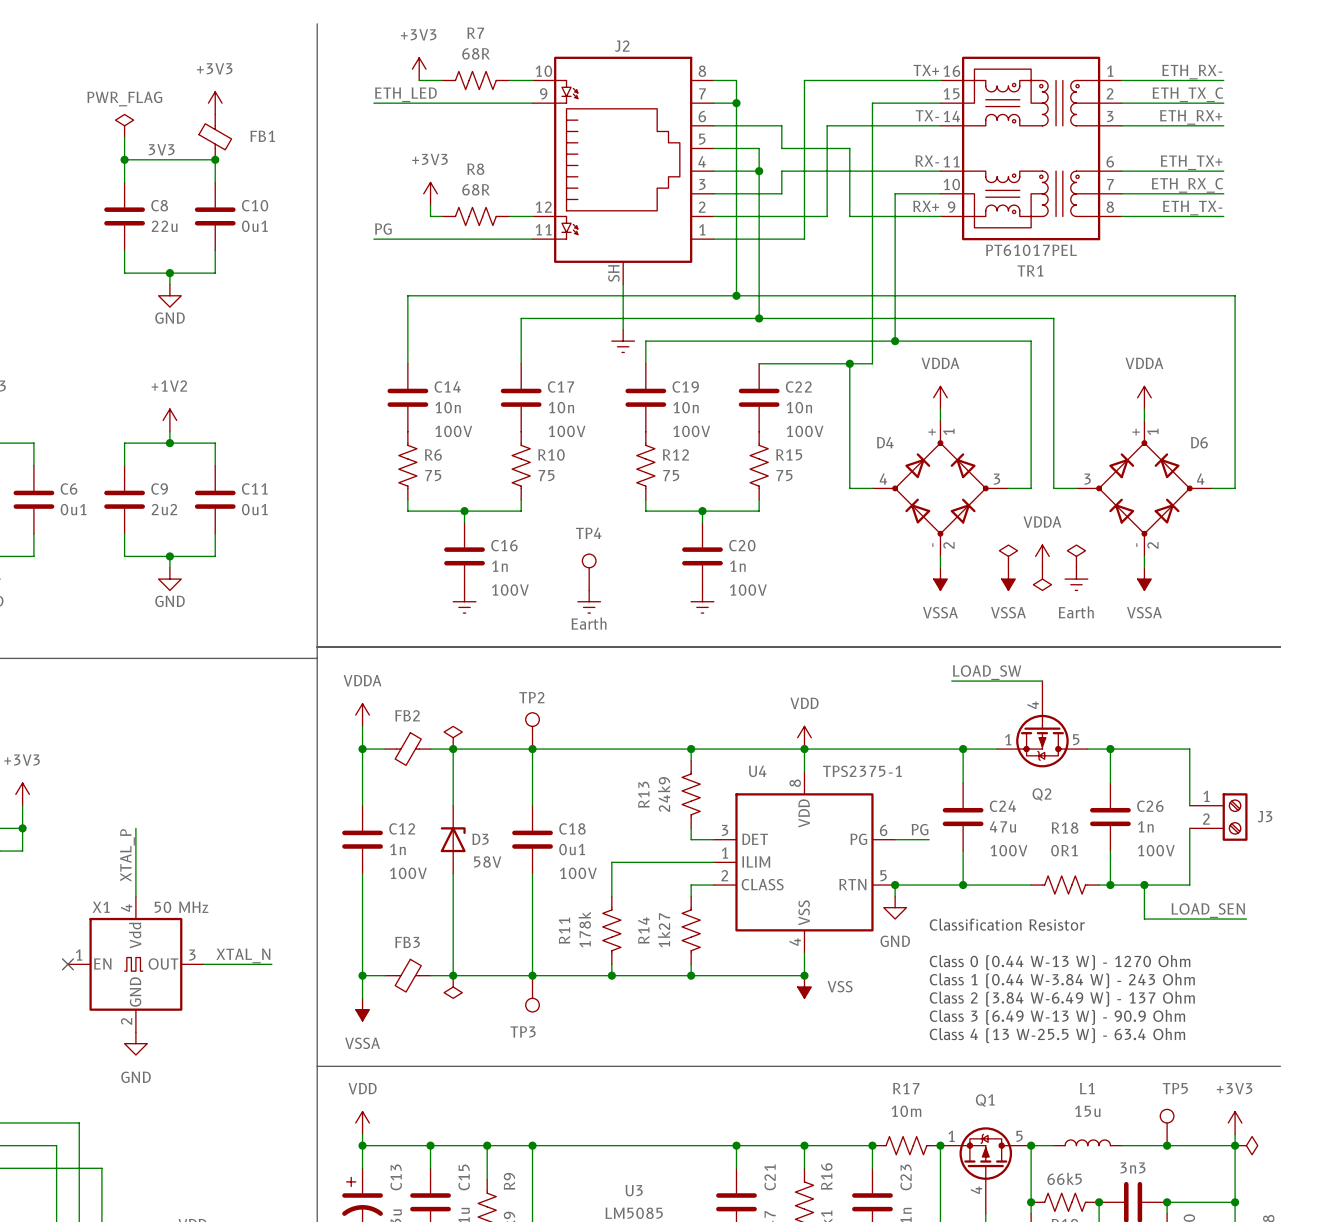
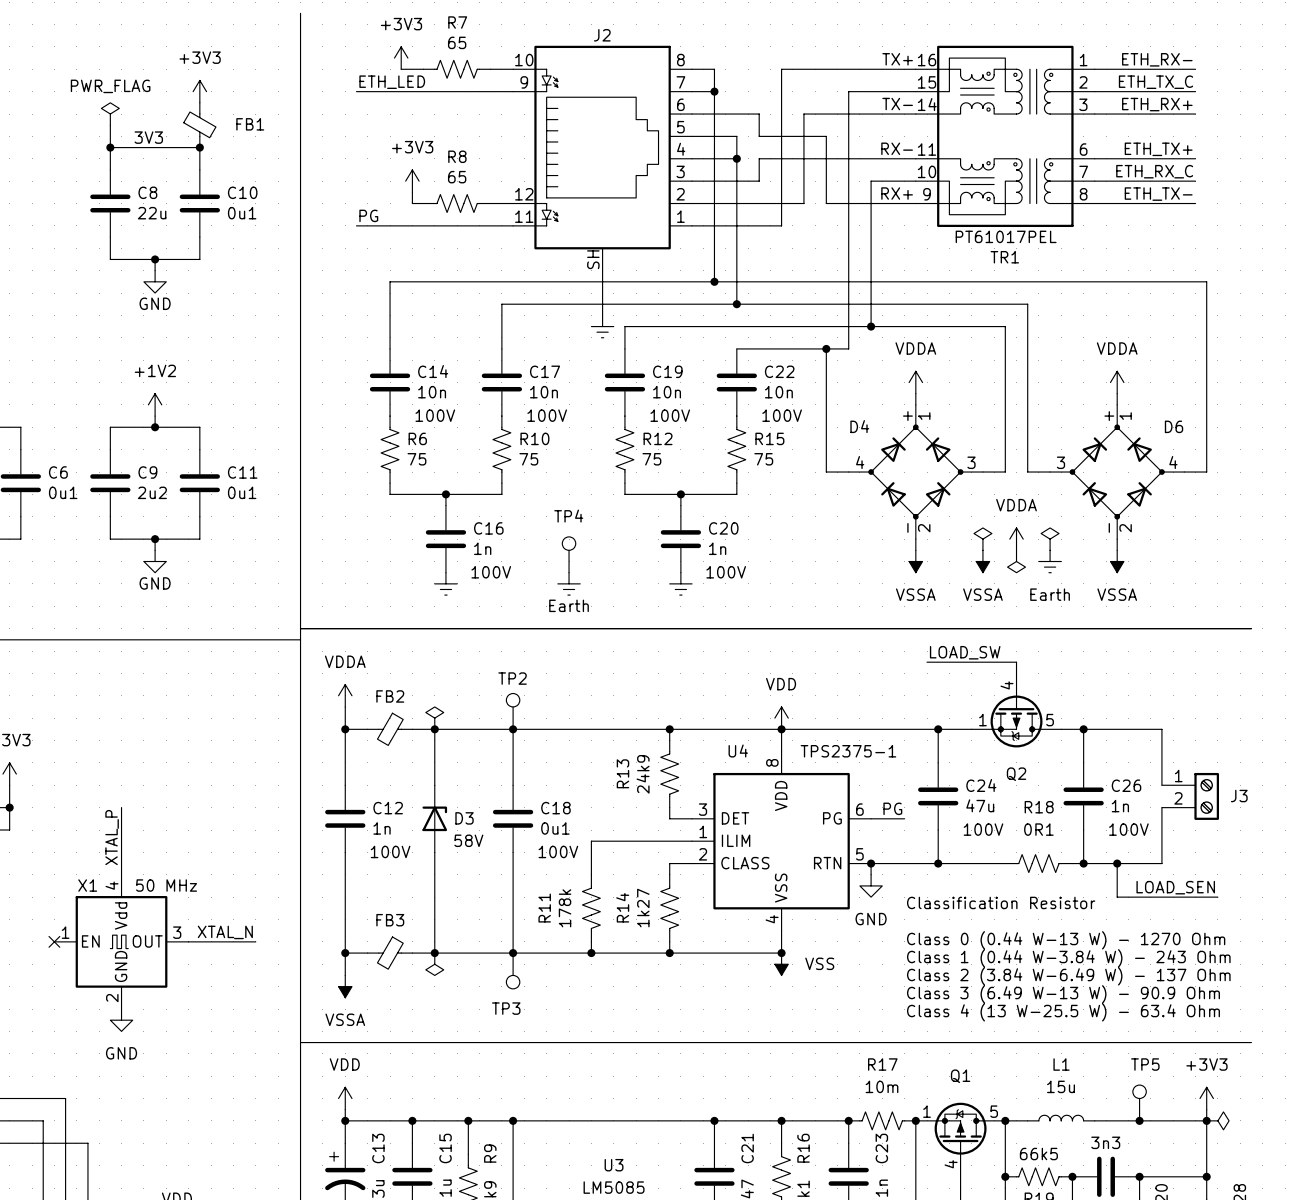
R7 value: 68R (476, 53) -> 65 (457, 42)
R8 value: 68R (476, 189) -> 65 (457, 177)

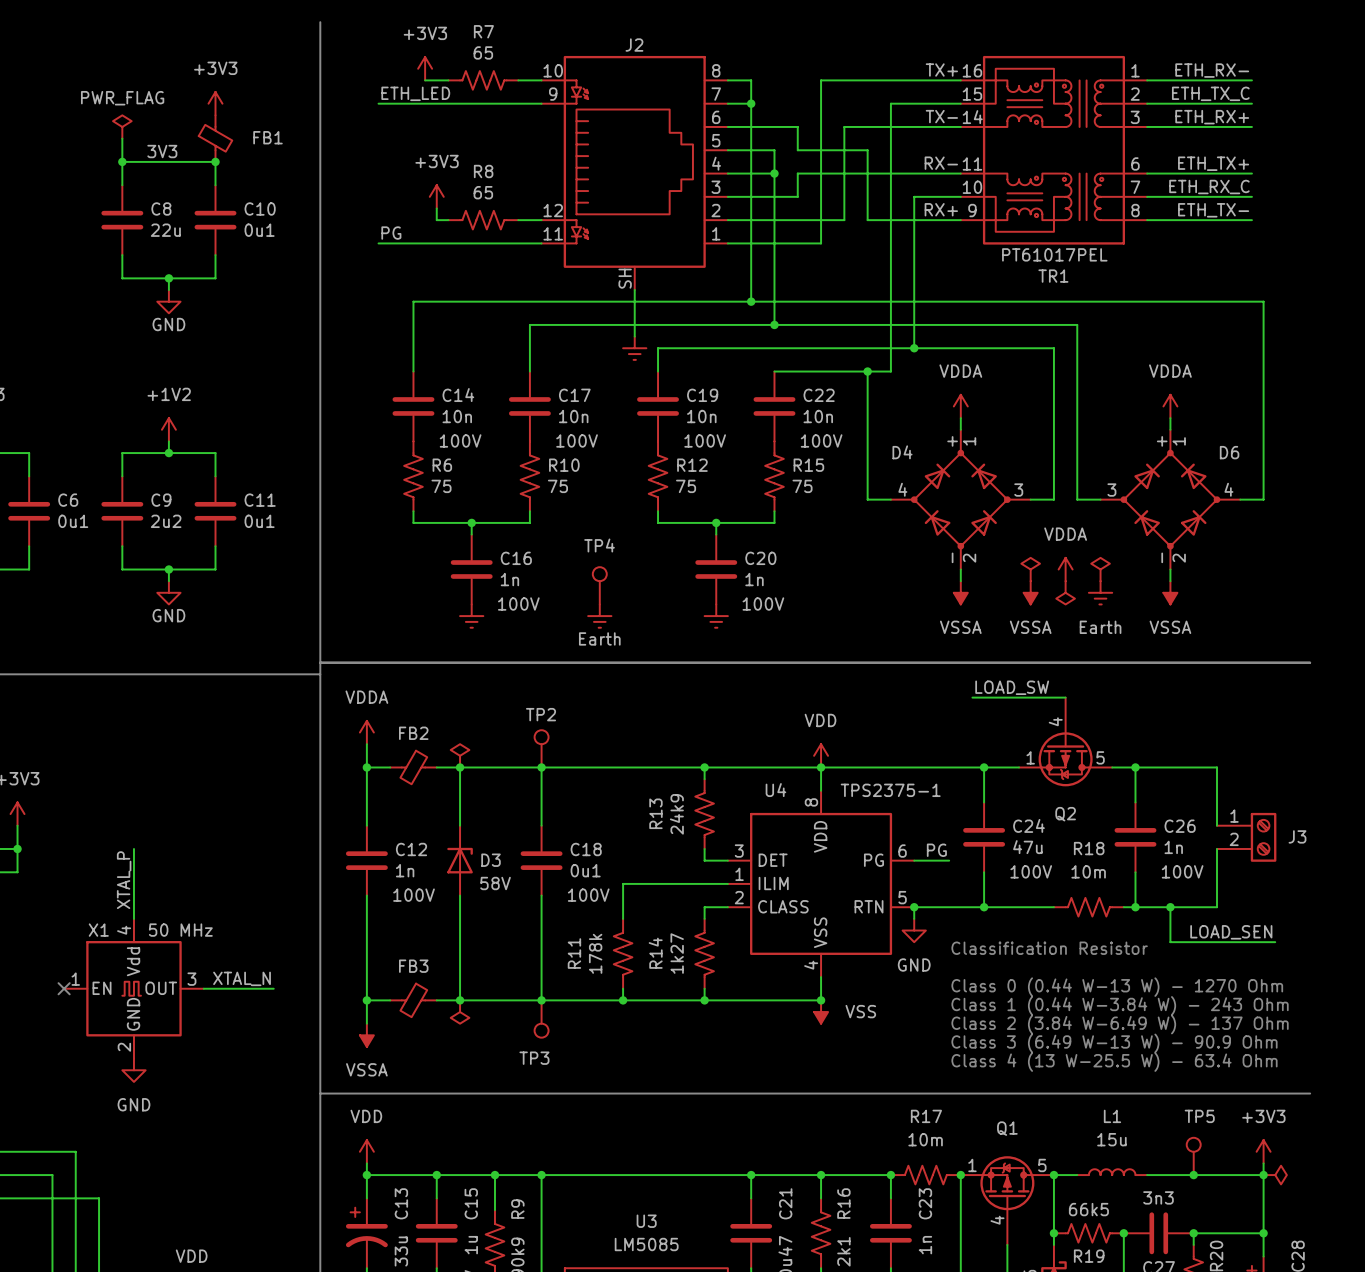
R18 value: 0R1 (1038, 829) -> 10m (1088, 871)

